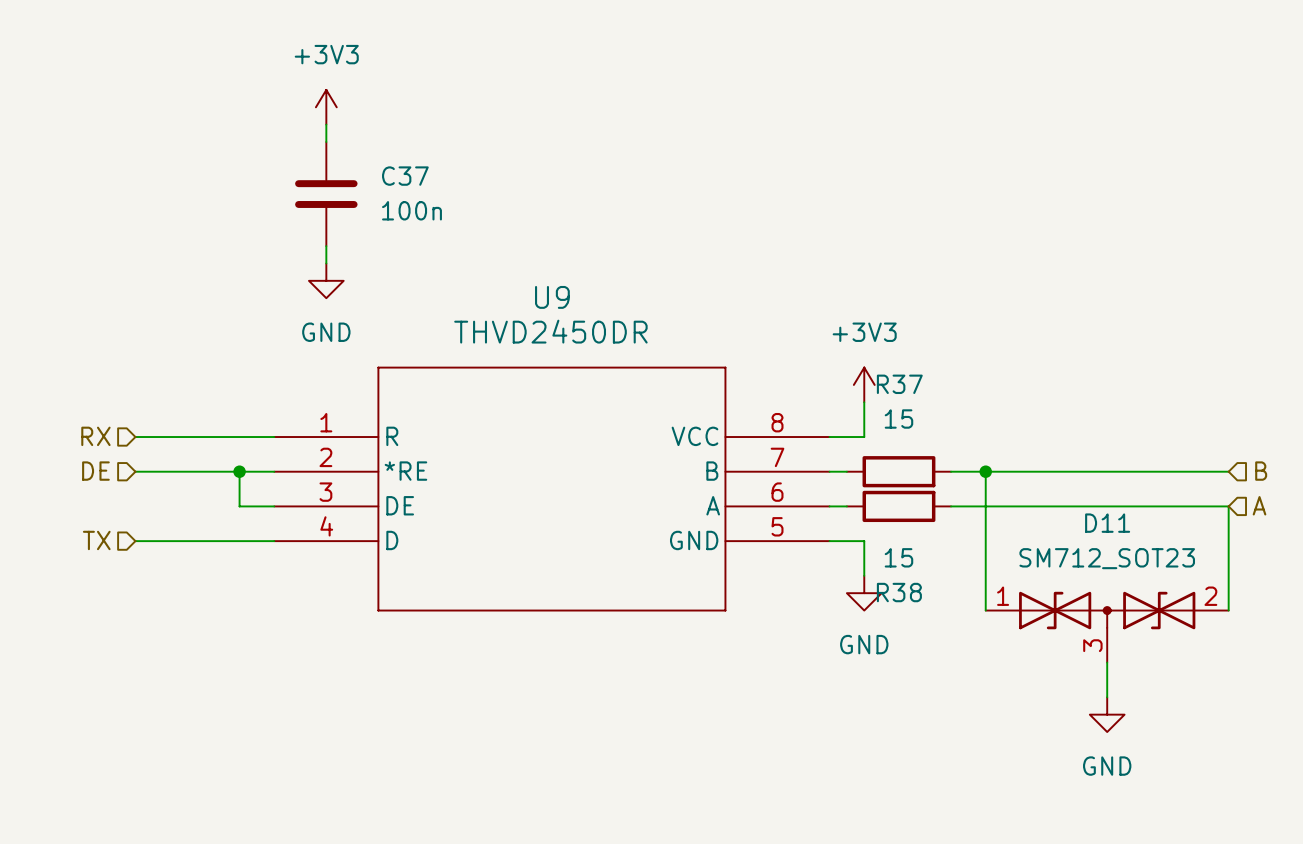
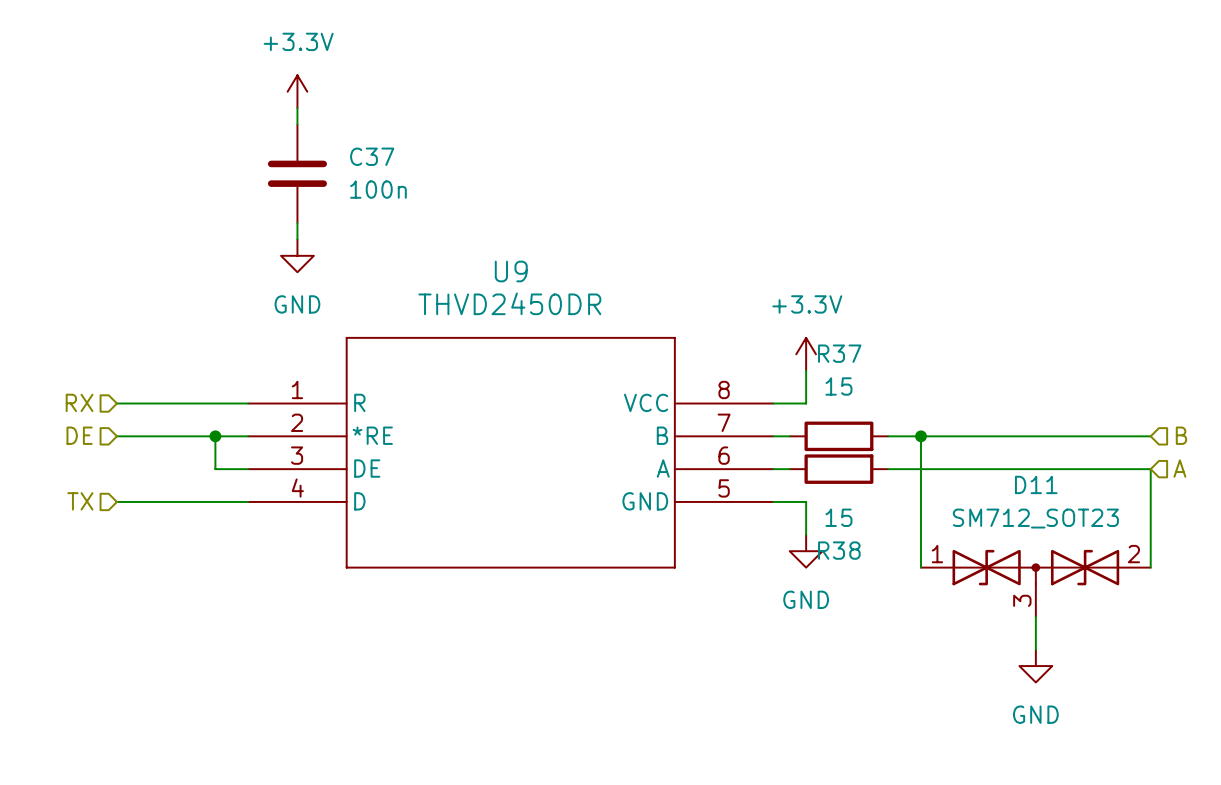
power symbol: +3V3 (326, 107) -> +3.3V (297, 91)
power symbol: +3V3 (864, 384) -> +3.3V (806, 354)

